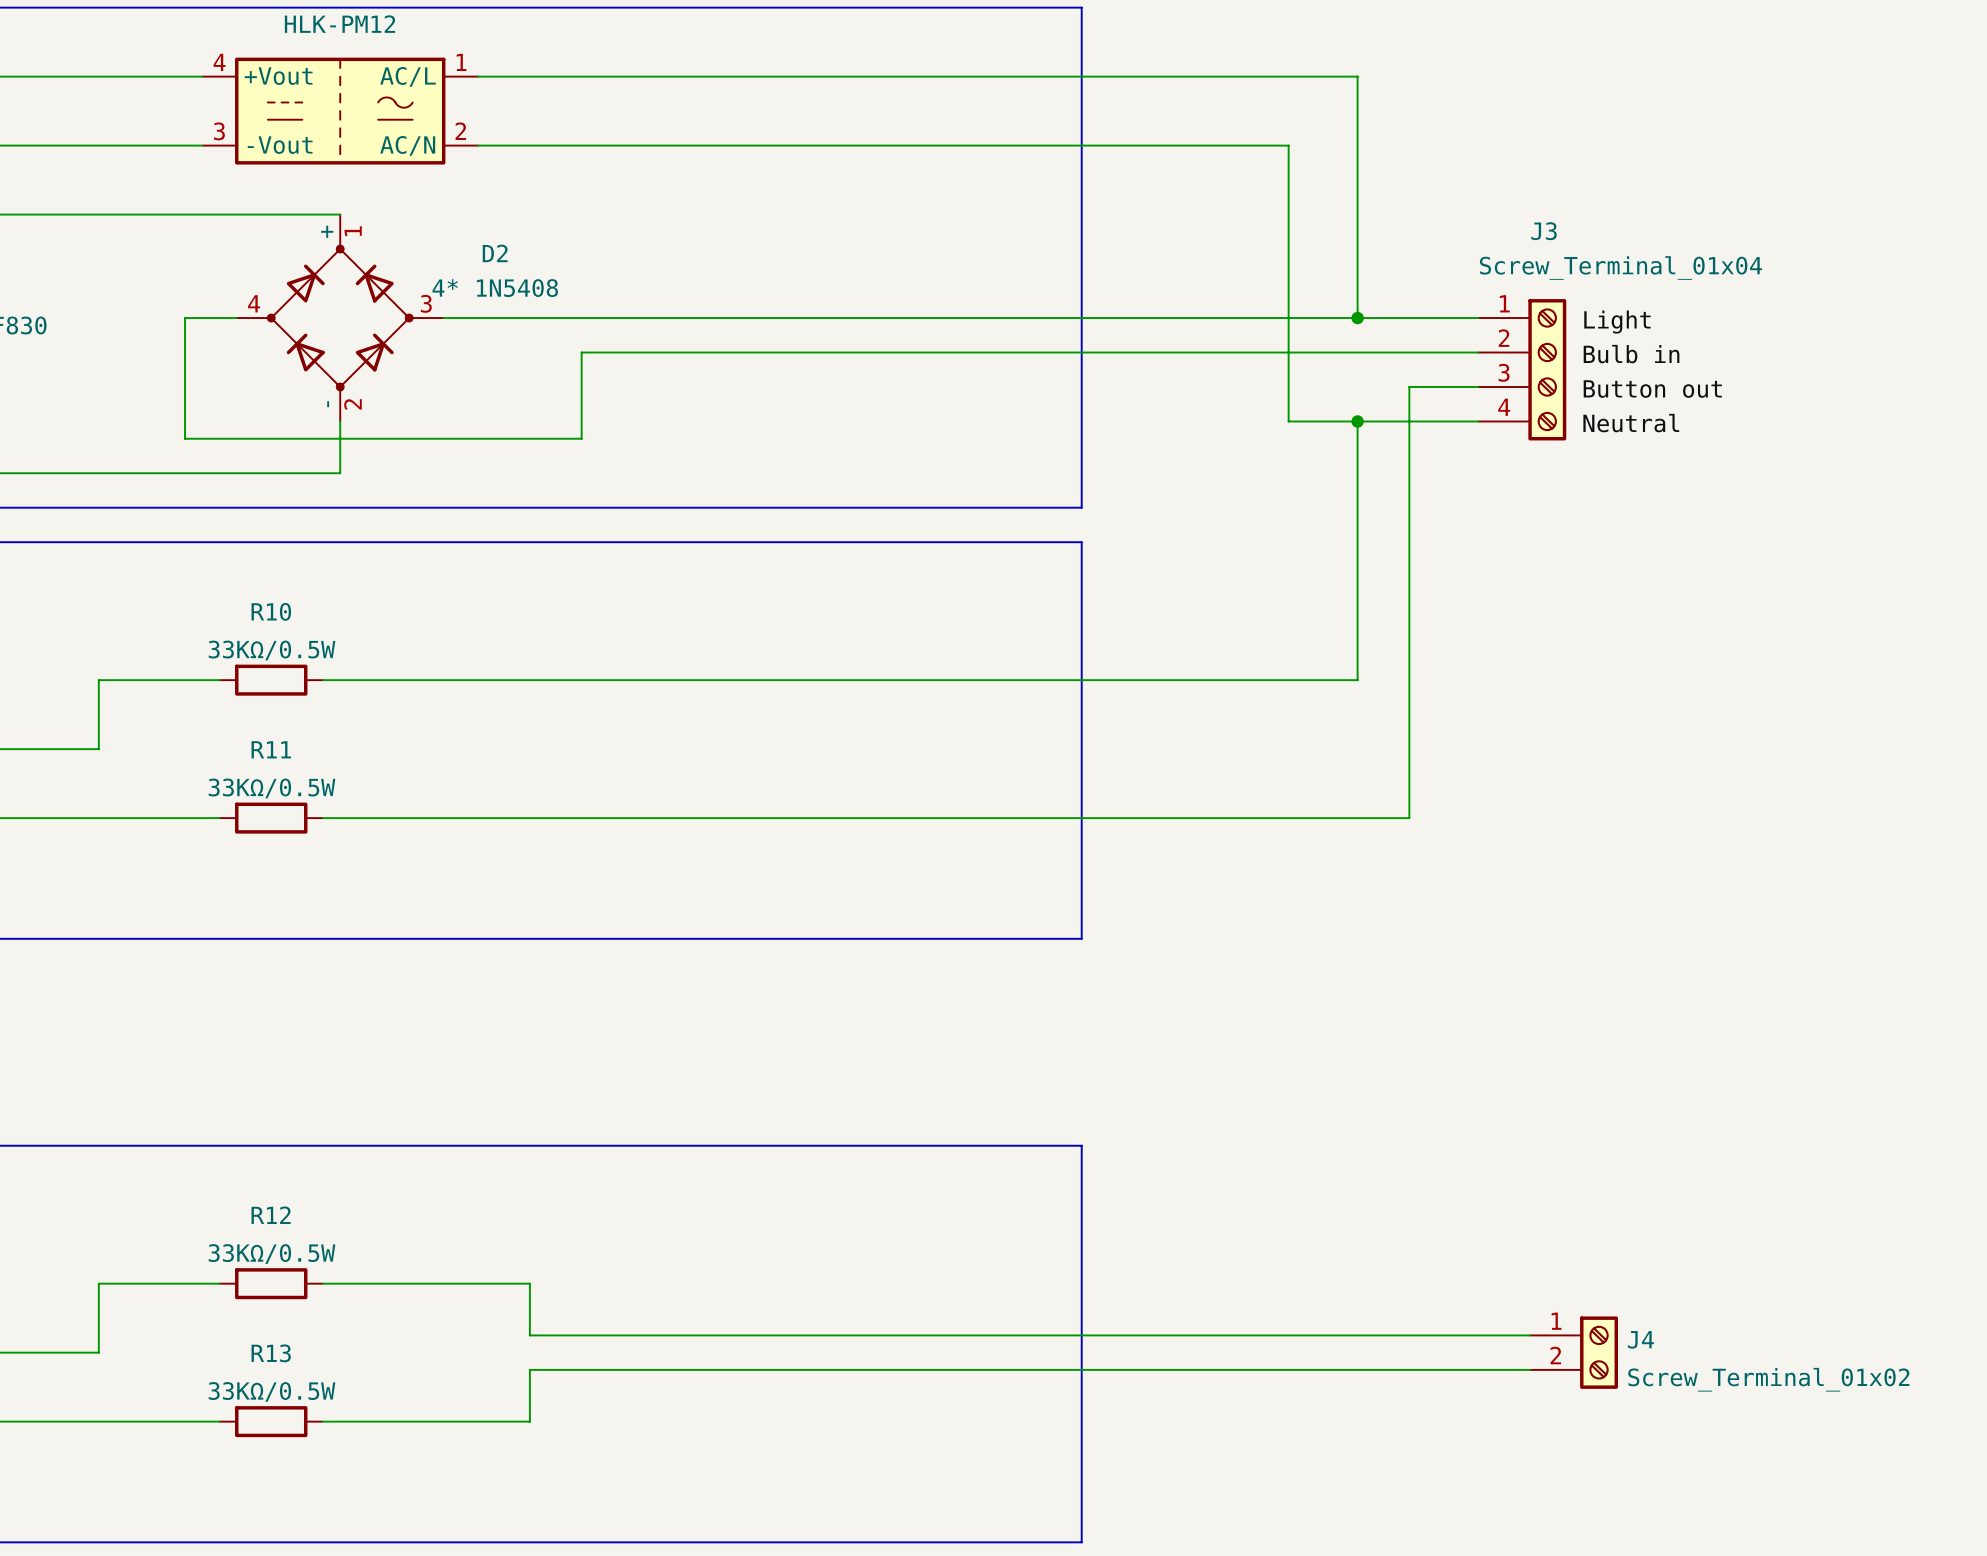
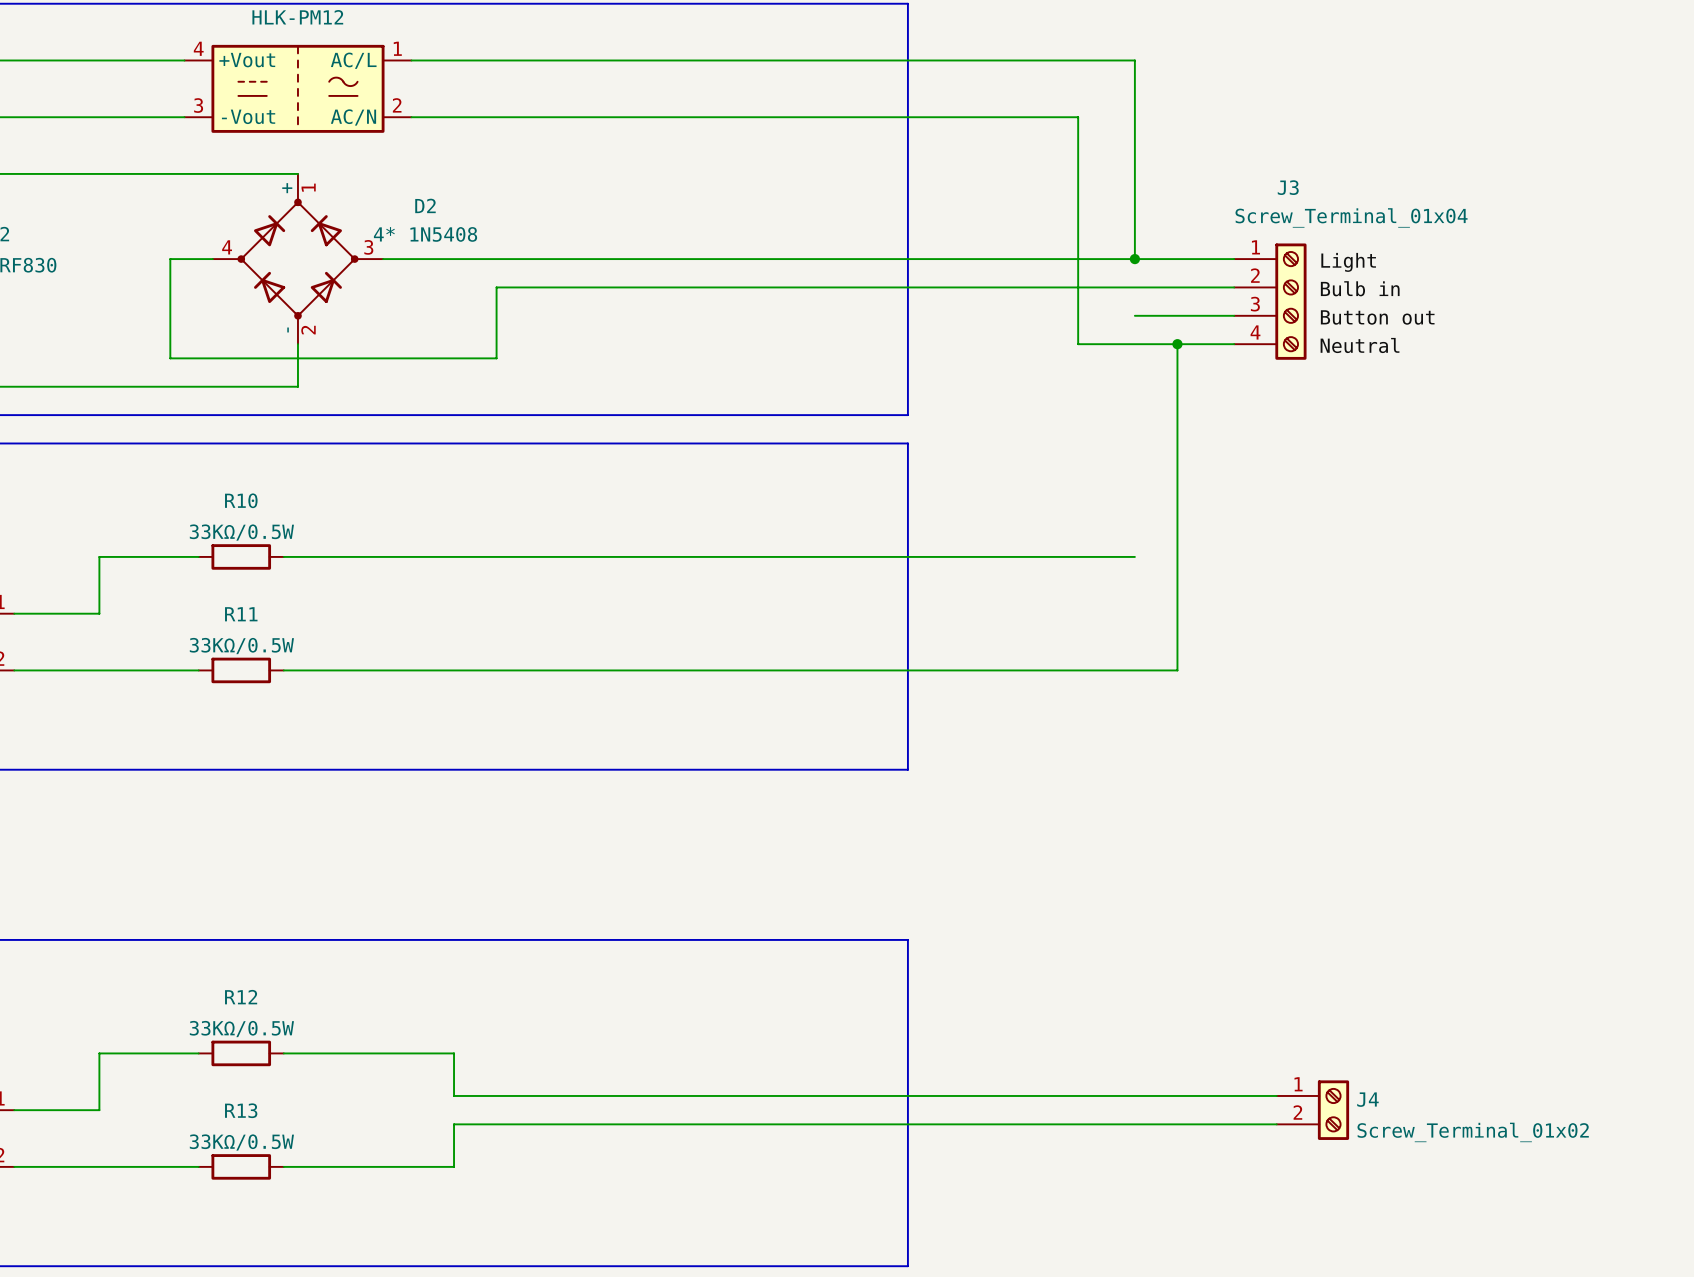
wire: (1409, 387) (1409, 421) -> (1177, 315) (1134, 315)
wire: (1357, 421) (1357, 680) -> none
junction position: (1357, 421) -> (1177, 344)

